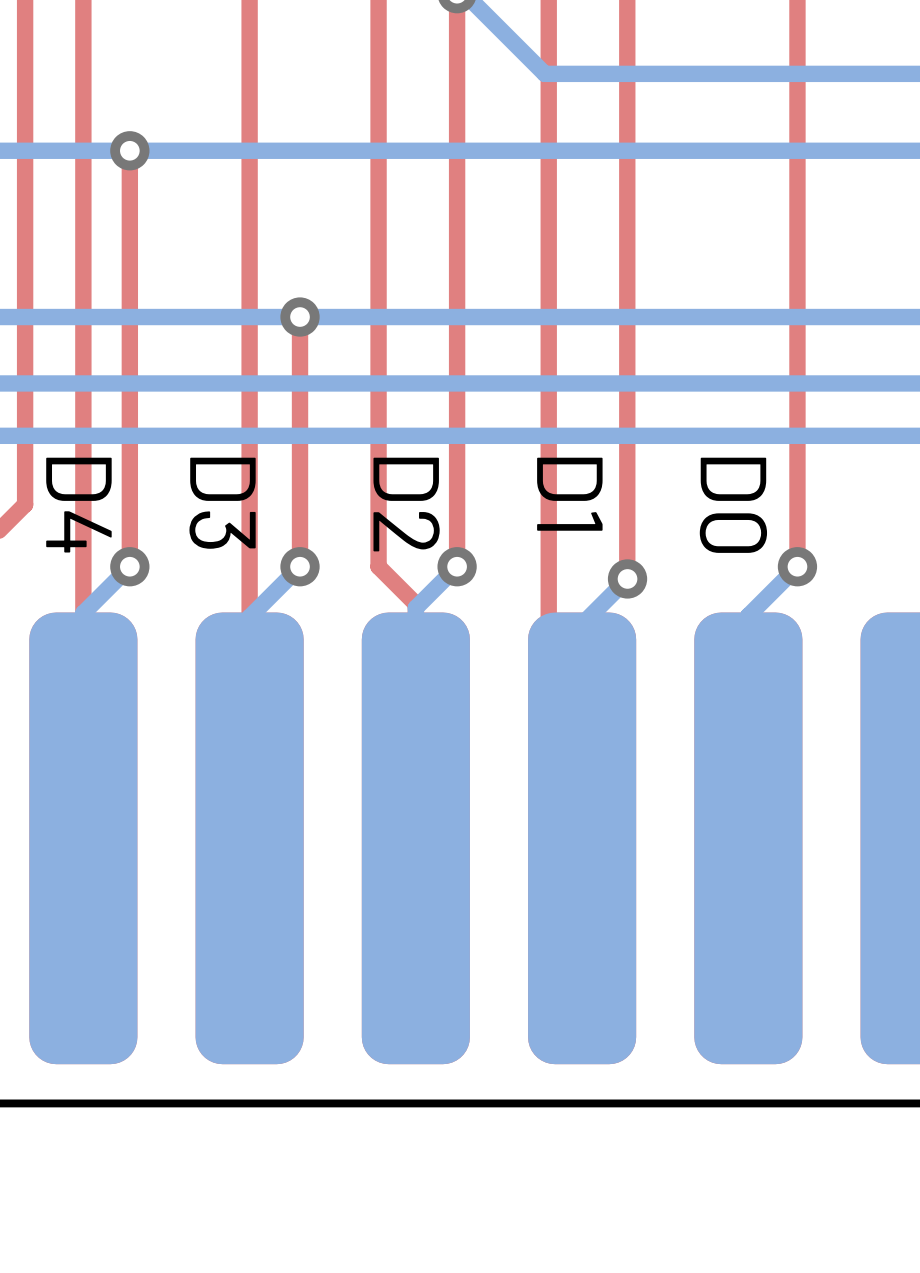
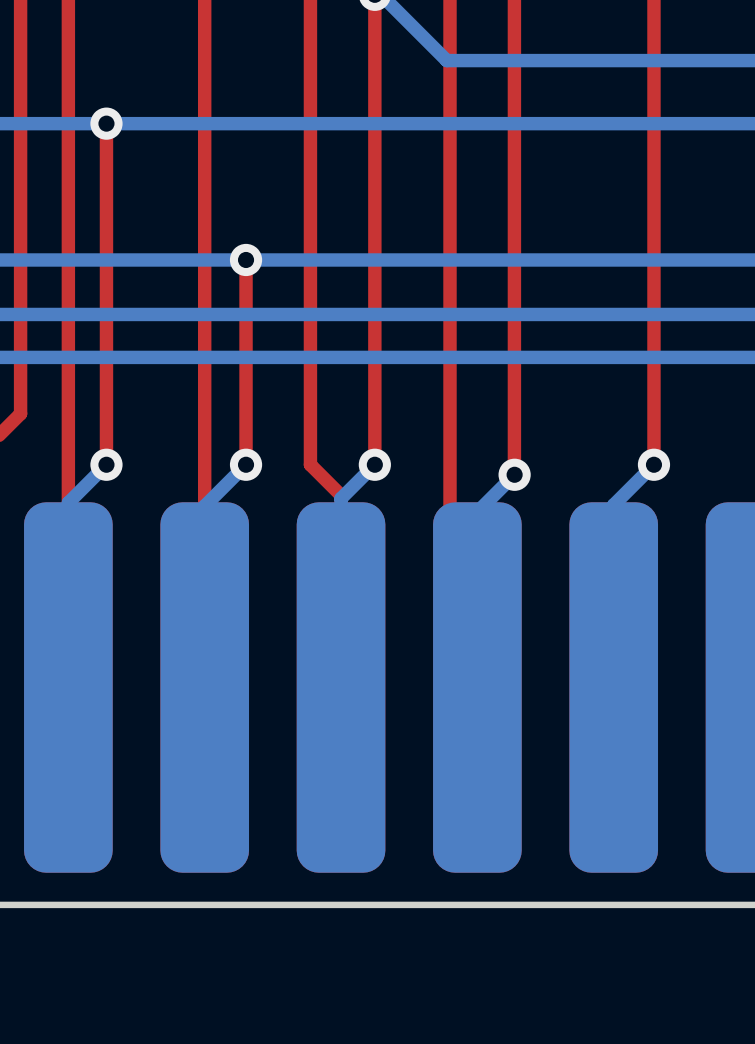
text: D1 (569, 494) -> none
text: D3 (222, 503) -> none
text: D2 (406, 504) -> none
text: D4 (78, 505) -> none
text: D0 (733, 505) -> none

